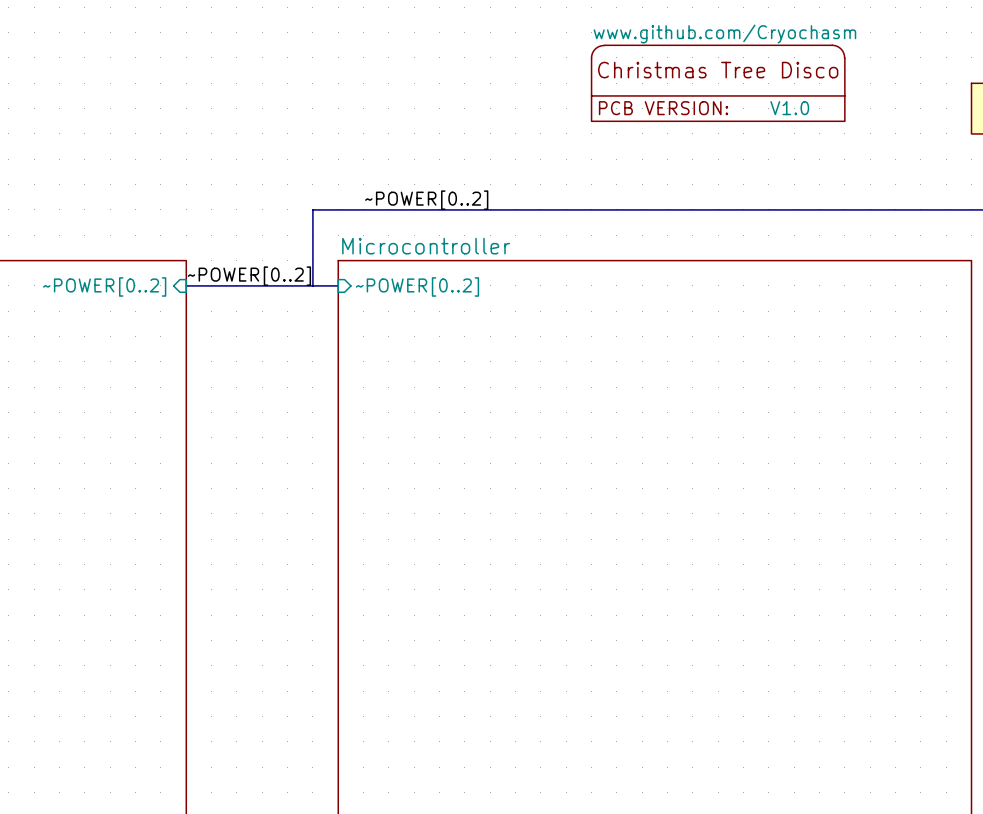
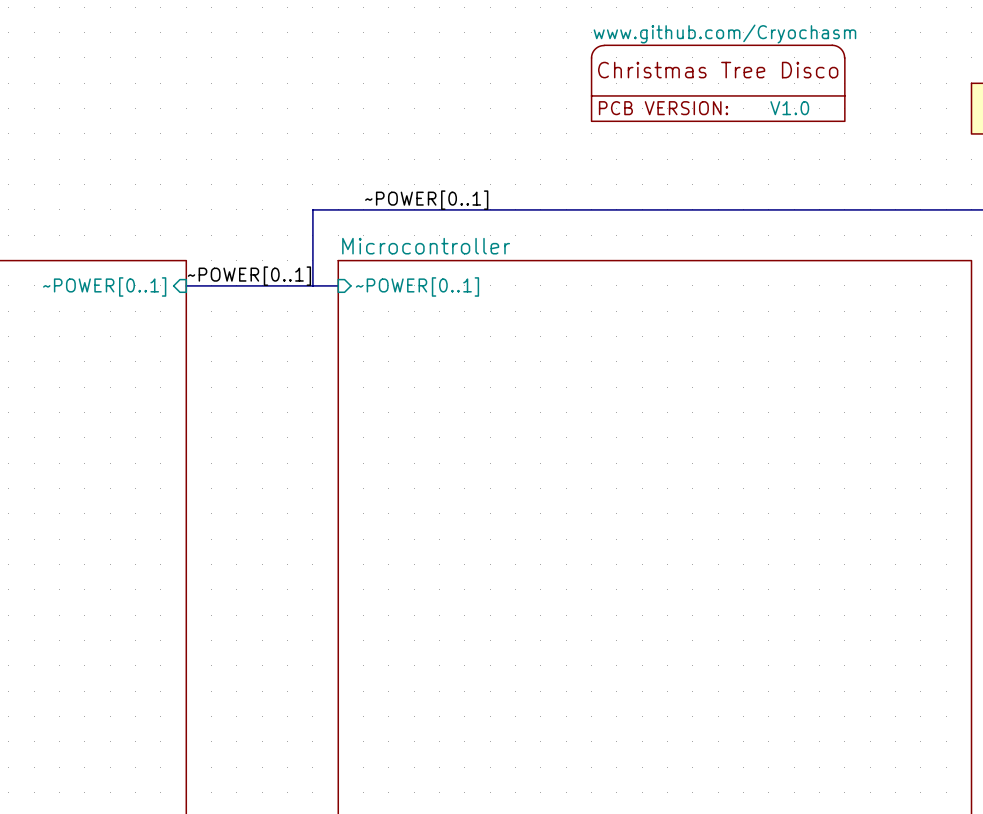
label: ~POWER[0..2] (426, 200) -> ~POWER[0..1] (426, 200)
label: ~POWER[0..2] (249, 276) -> ~POWER[0..1] (249, 276)
sheet pin: ~POWER[0..2] (104, 286) -> ~POWER[0..1] (104, 286)
sheet pin: ~POWER[0..2] (417, 286) -> ~POWER[0..1] (417, 286)

